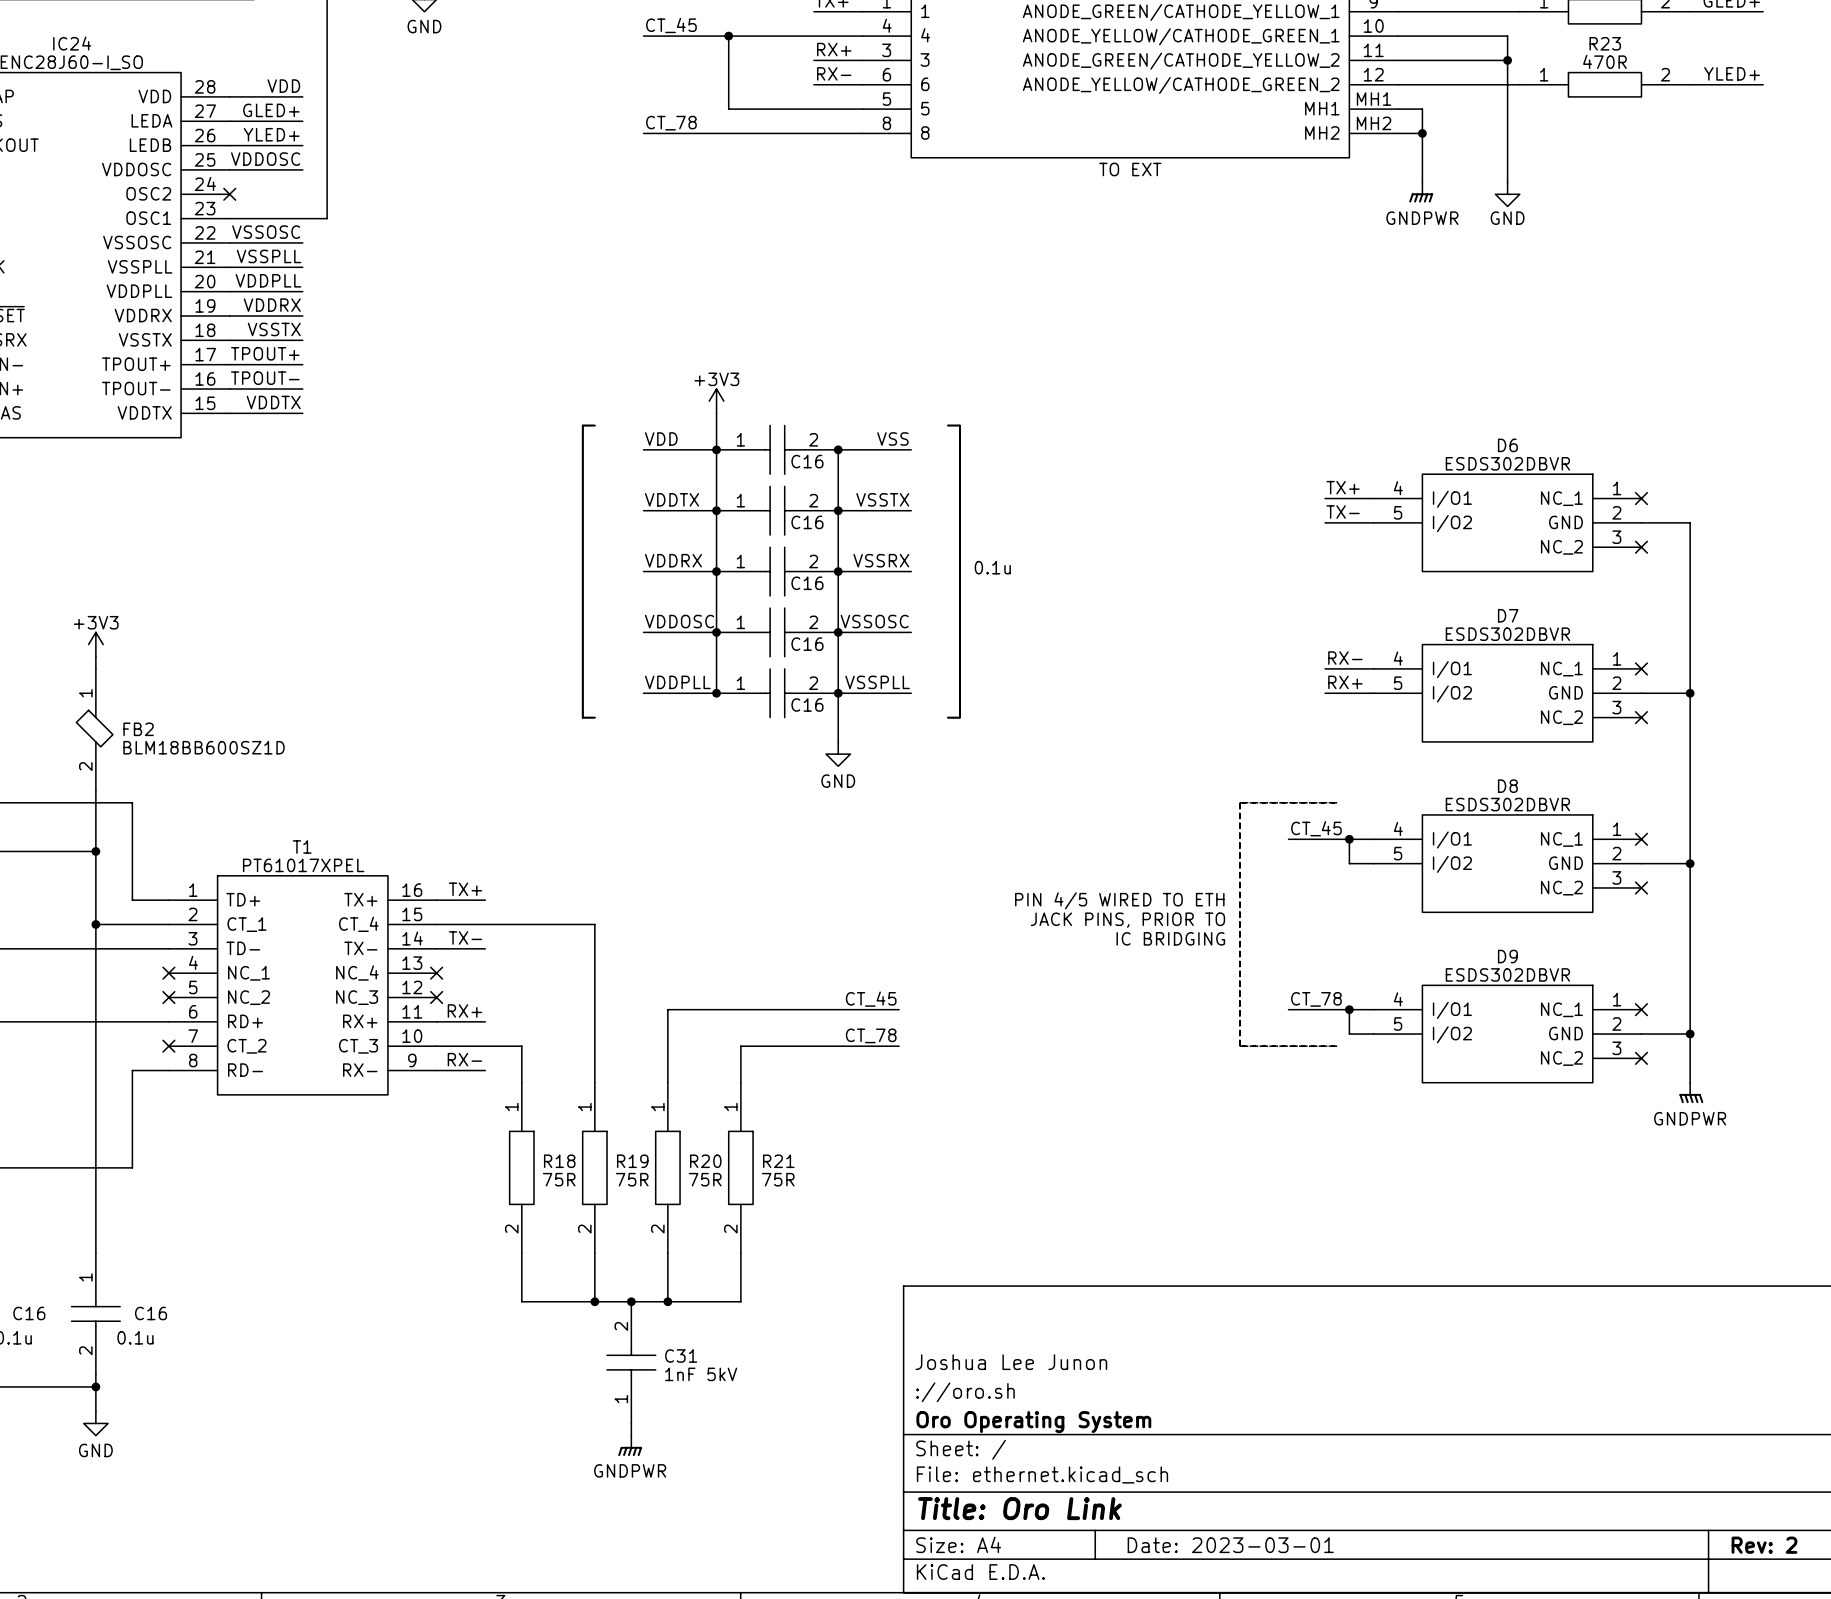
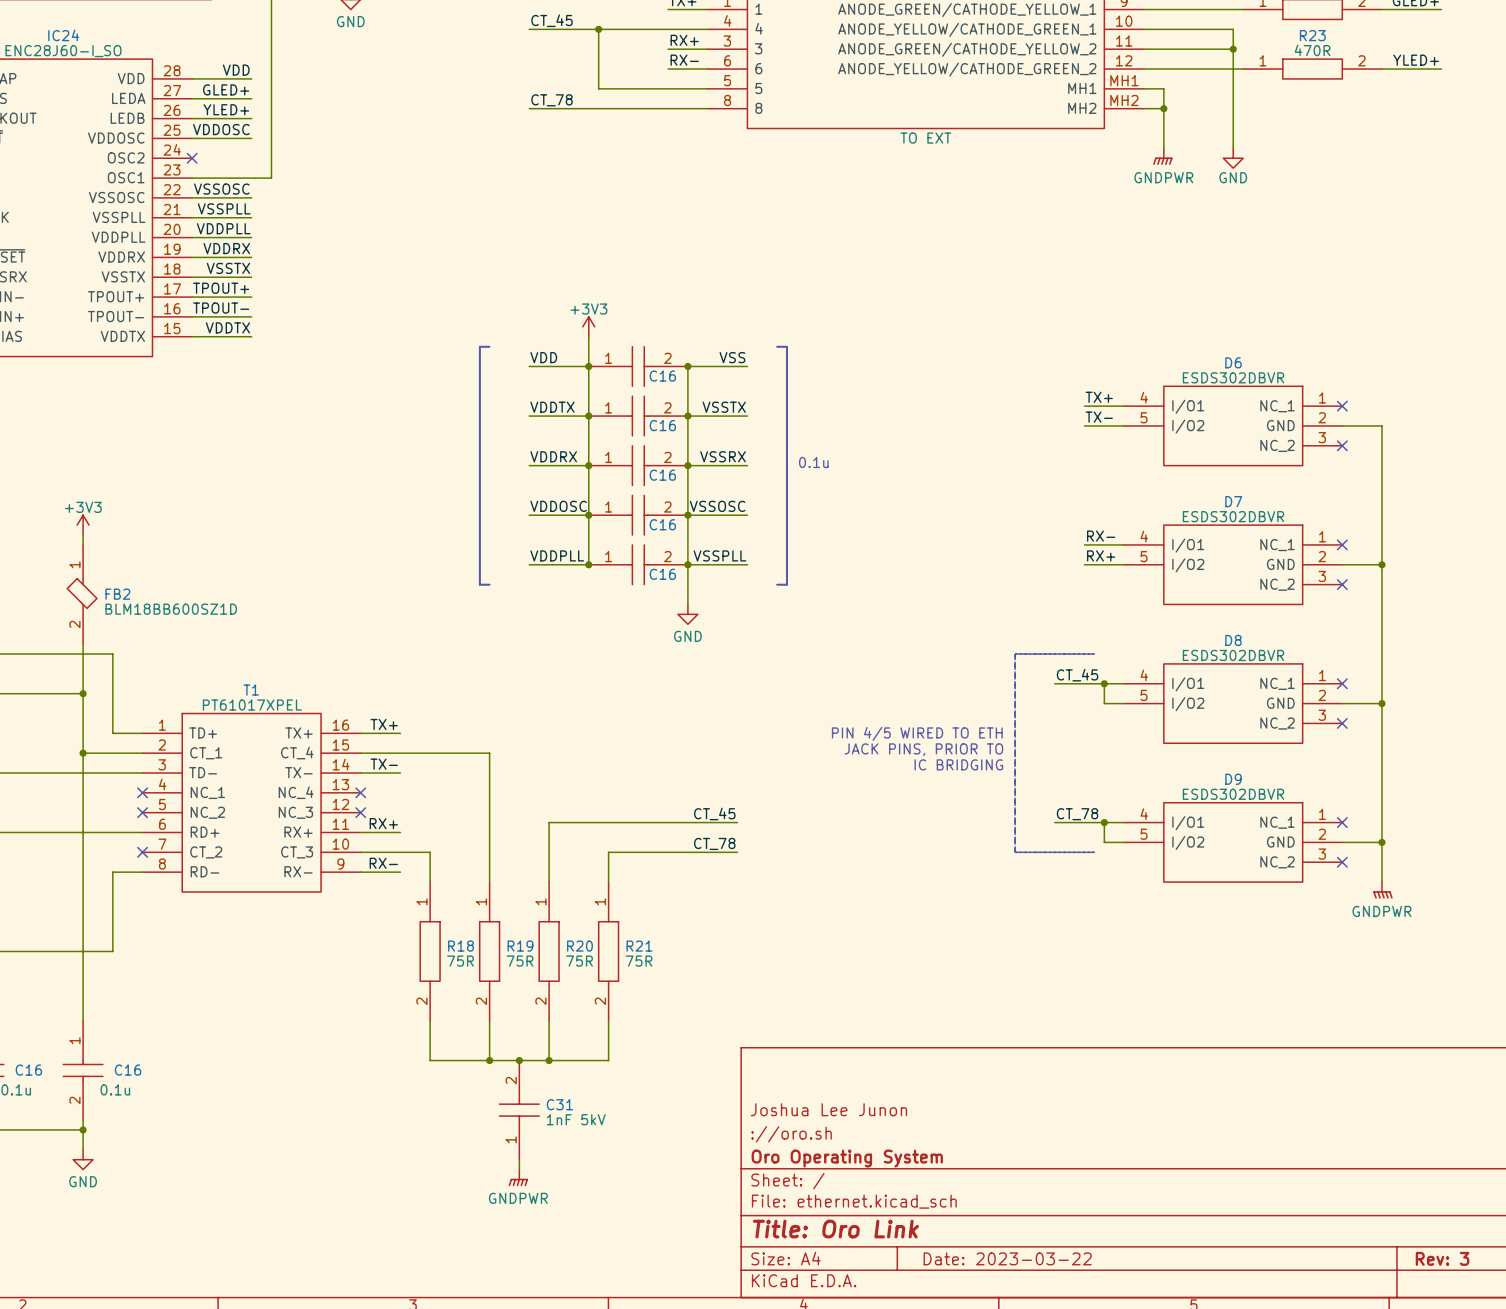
title block: Date: 2023-03-01 (1230, 1545) -> Date: 2023-03-22 (1007, 1258)
title block: Rev: 2 (1764, 1545) -> Rev: 3 (1442, 1258)

